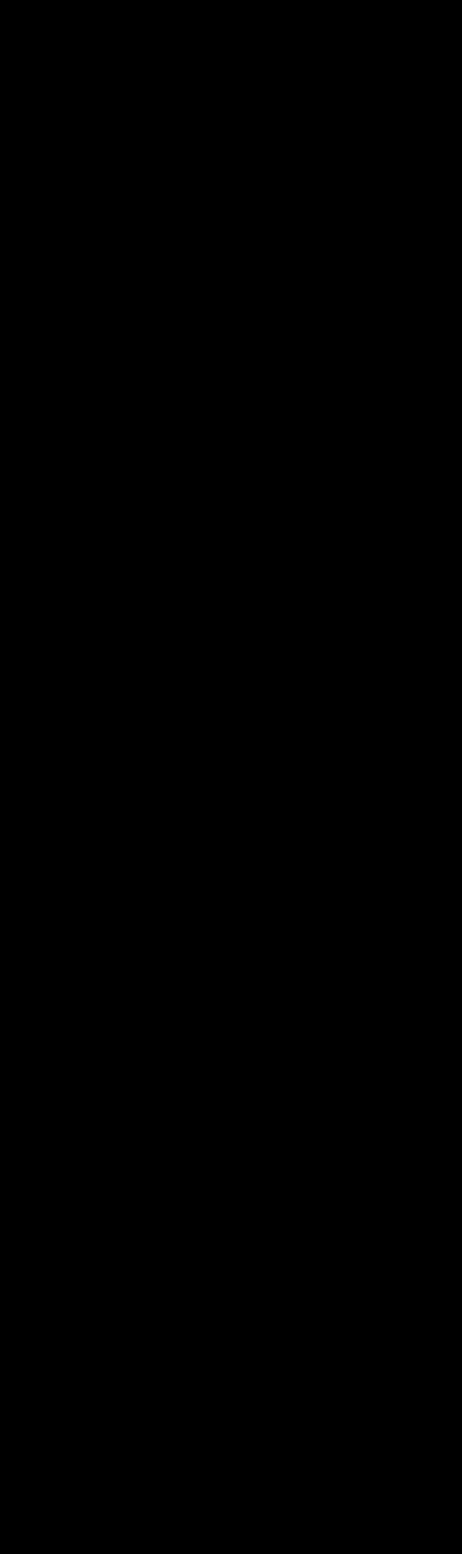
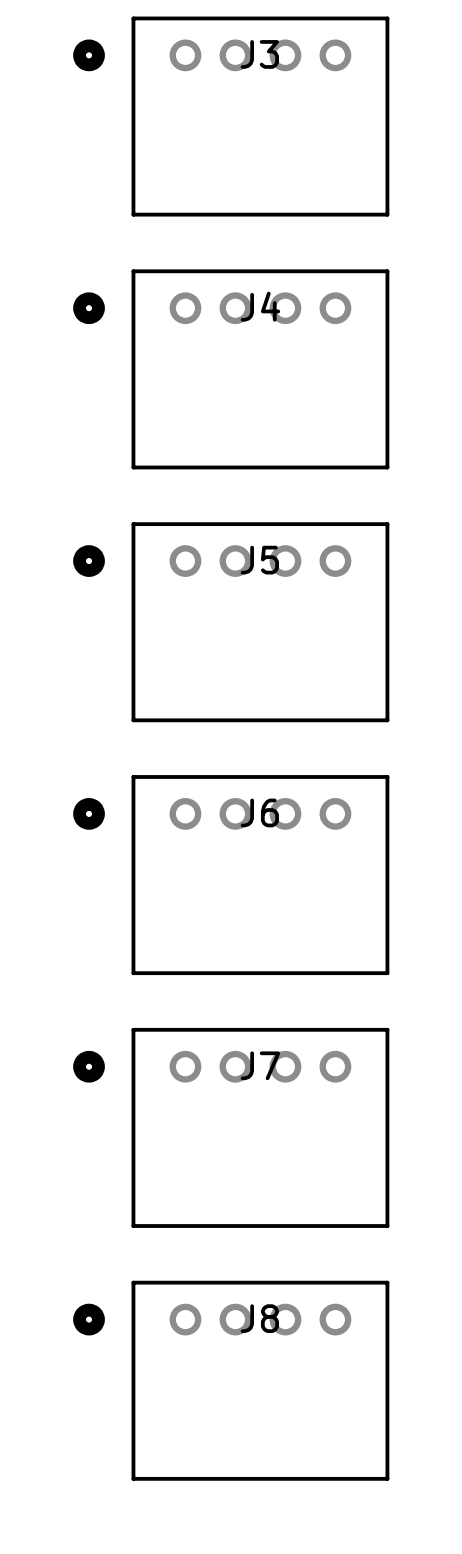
J3: none -> (231, 116)
J4: none -> (231, 369)
J5: none -> (231, 622)
J6: none -> (231, 875)
J7: none -> (231, 1127)
J8: none -> (231, 1380)

